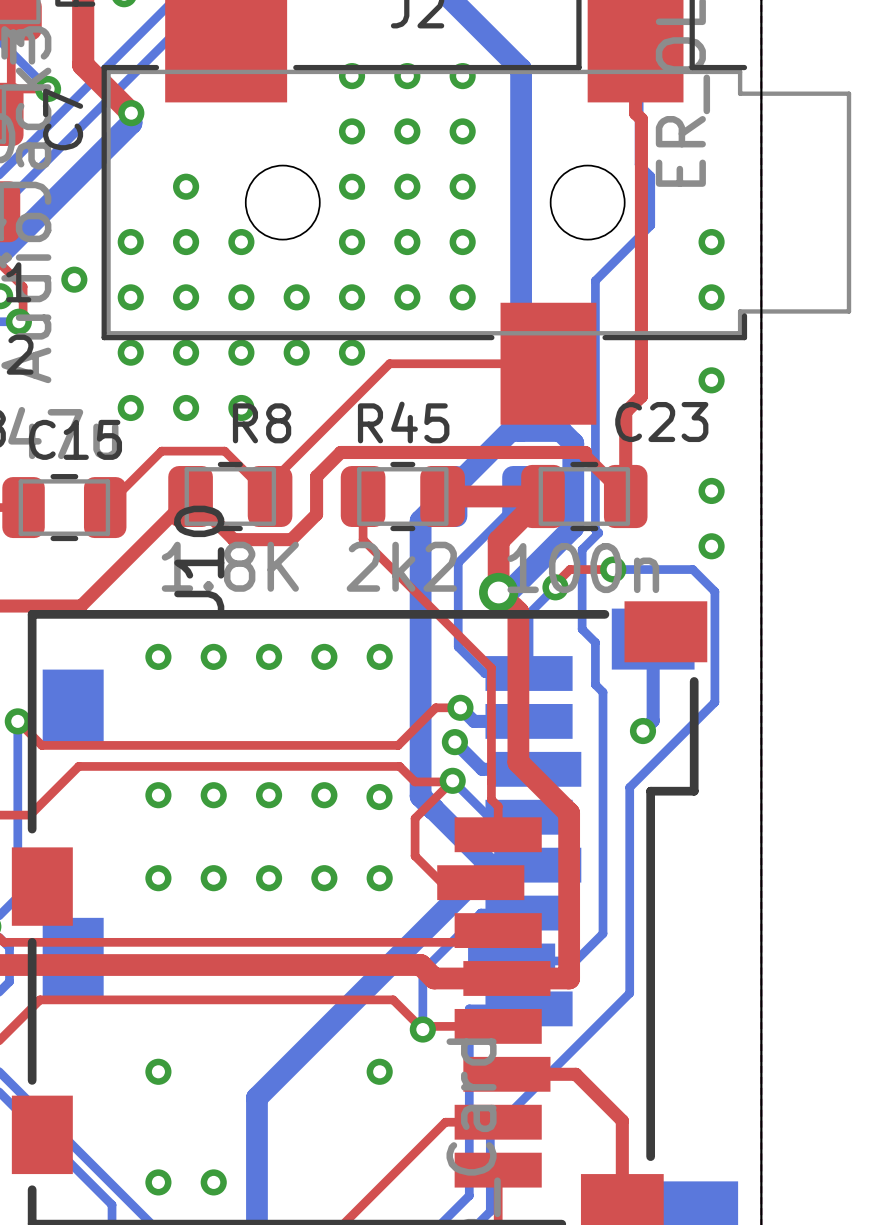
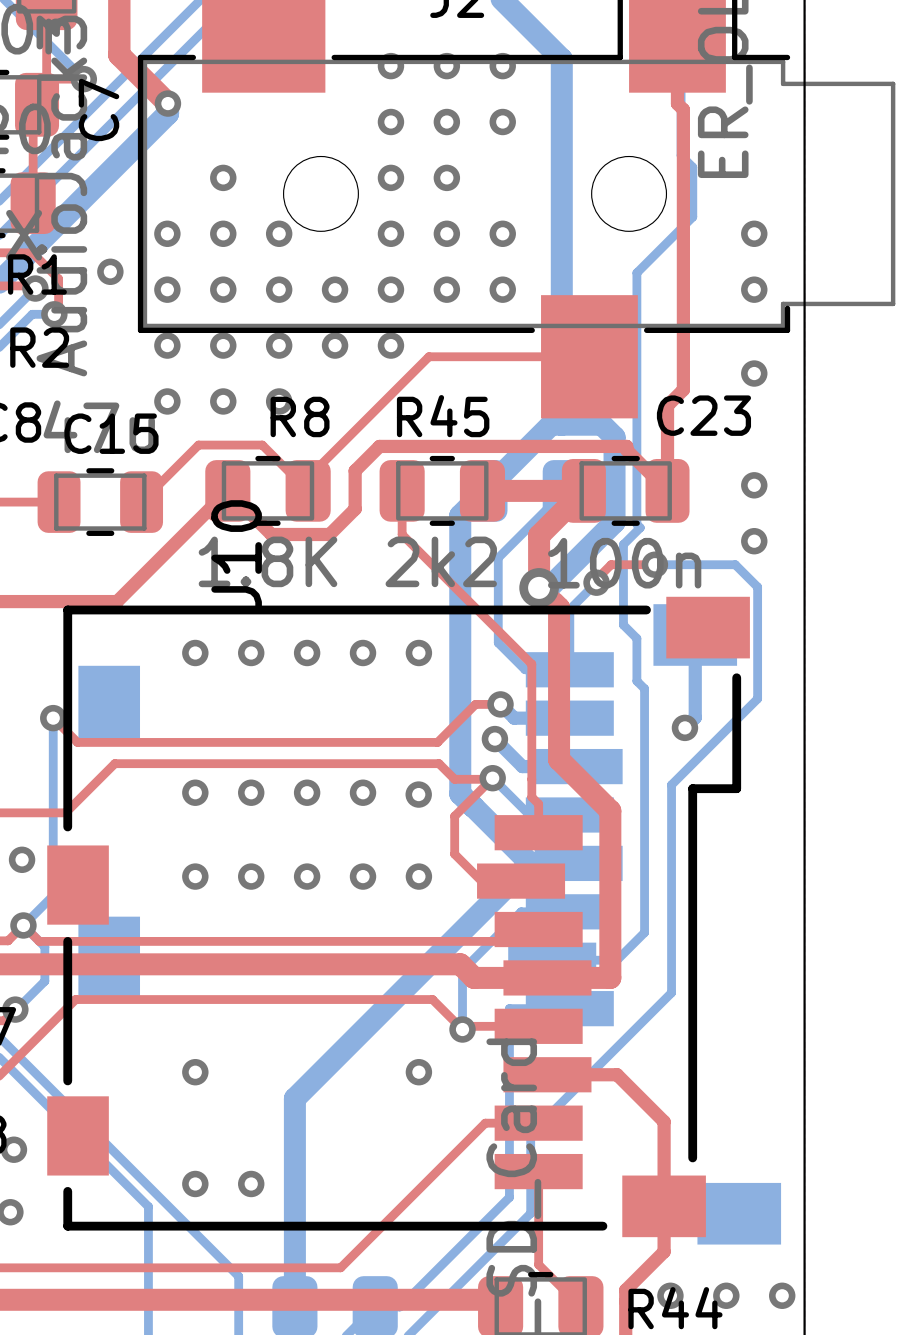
via: (462, 186) -> none

